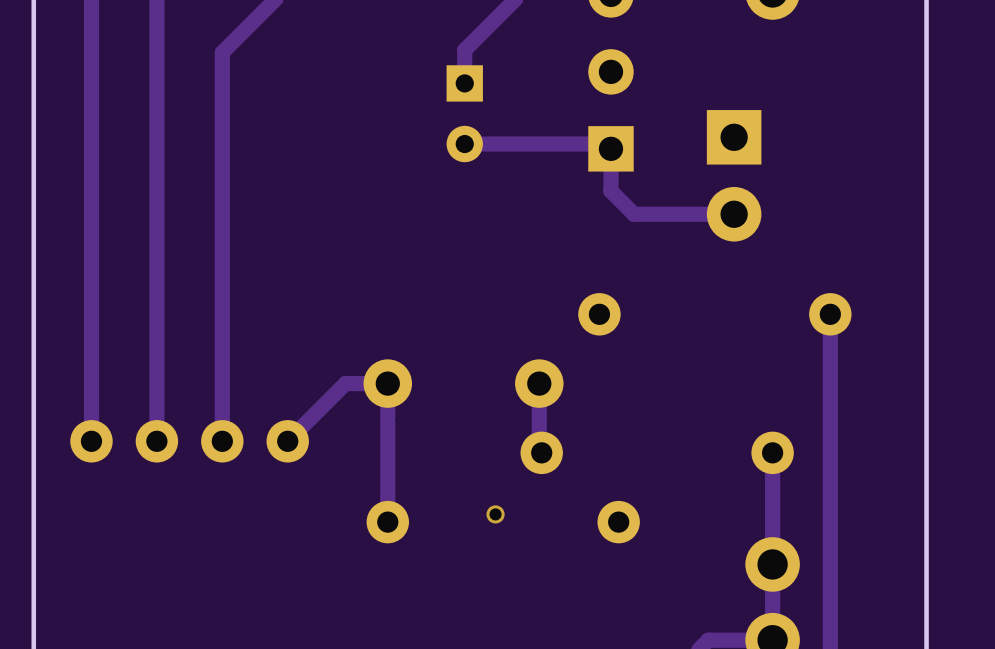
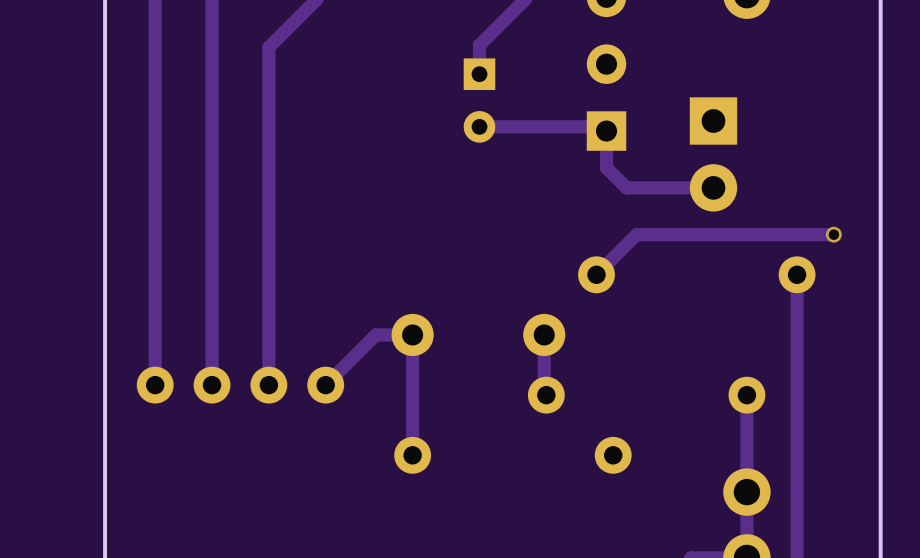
track: none -> (833, 234) (636, 234) (596, 274)
via: none -> (833, 234)
via: (495, 514) -> none

